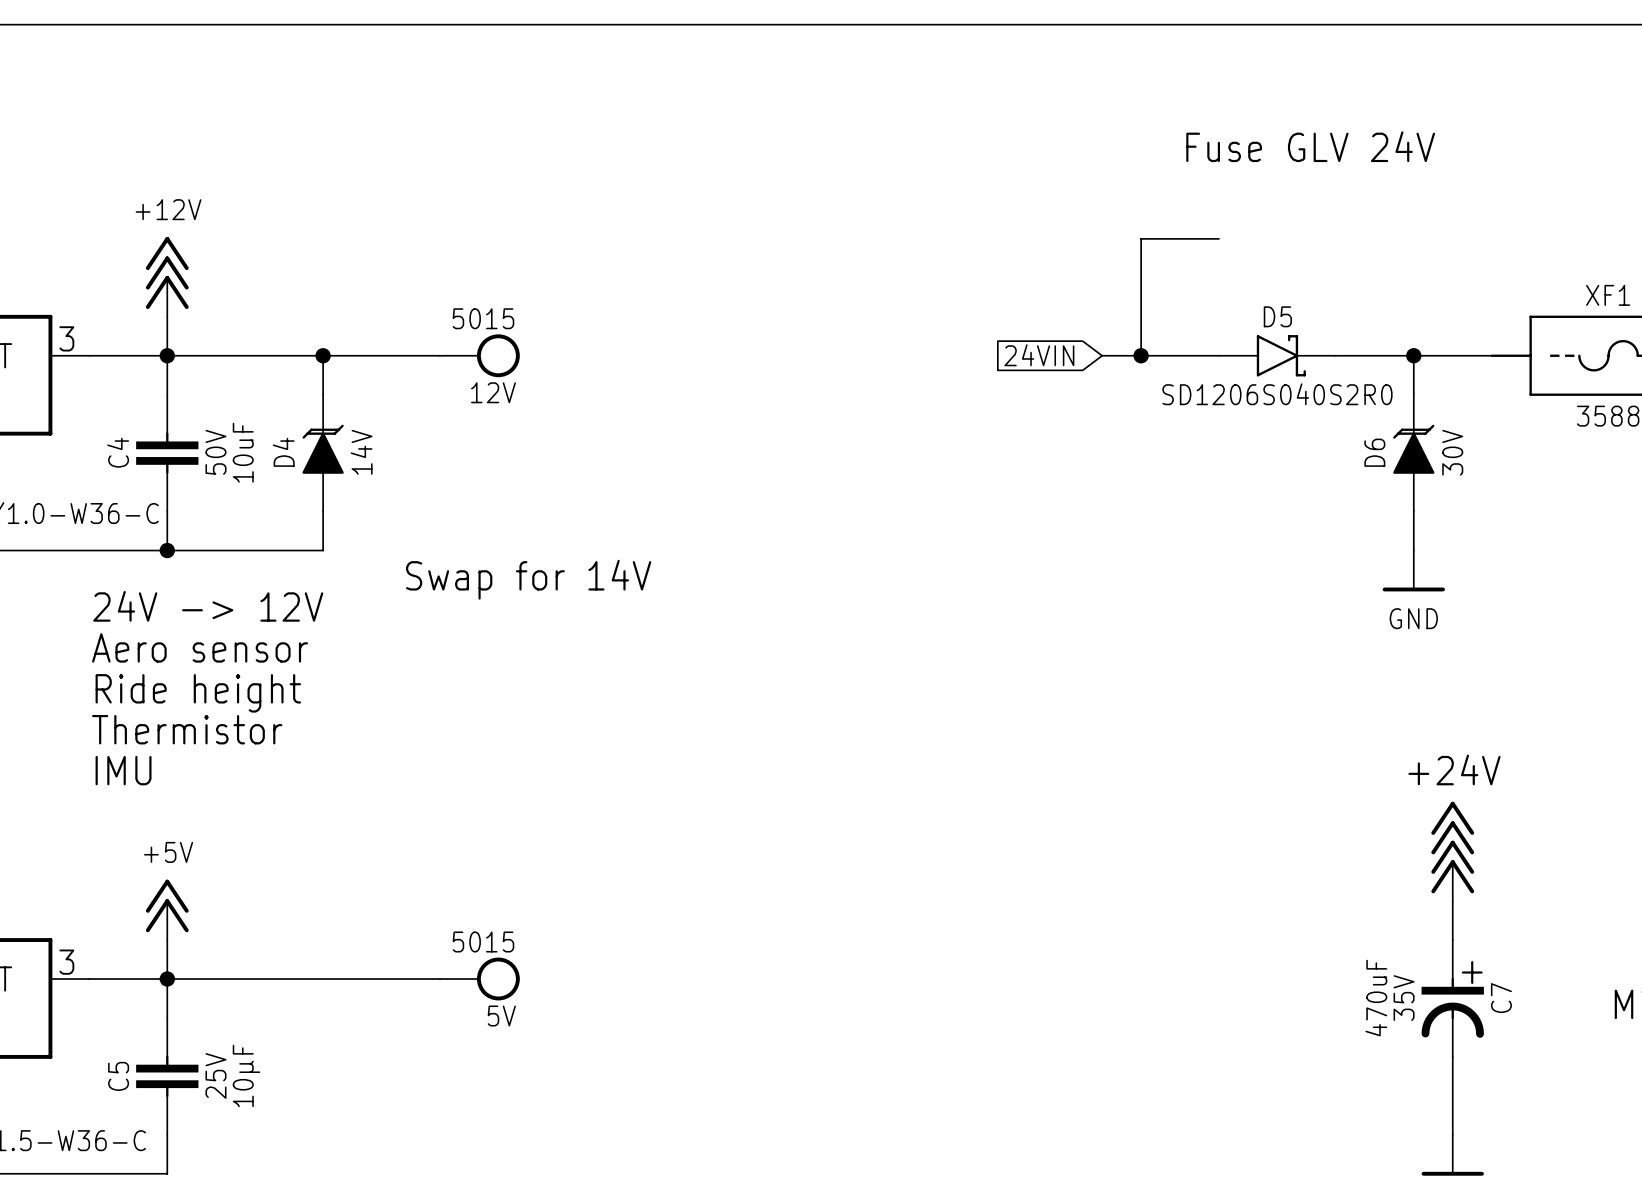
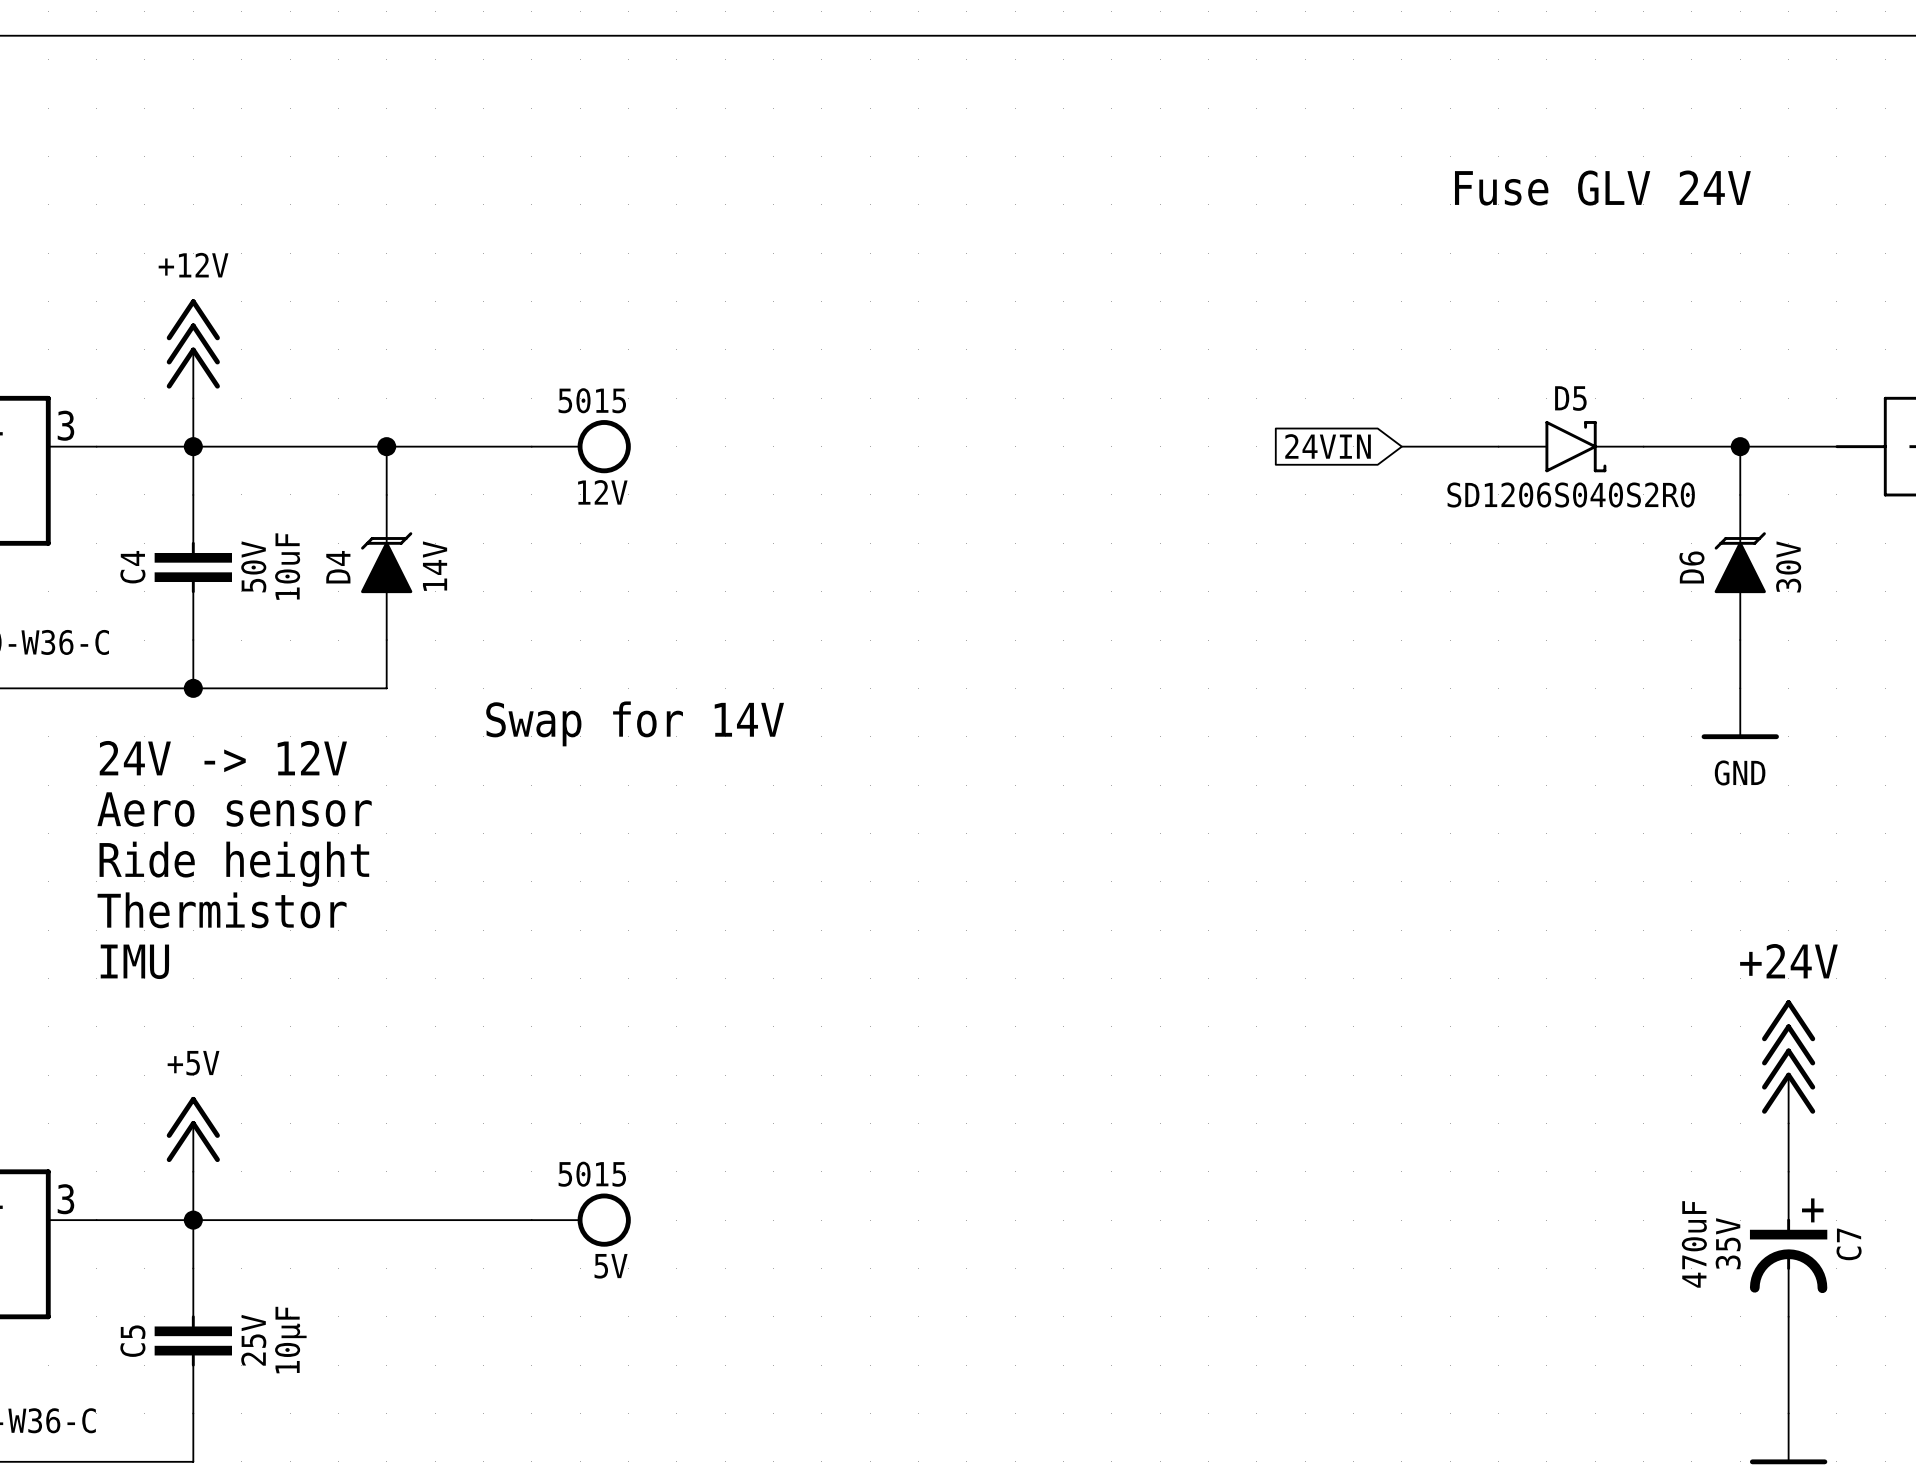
wire: (1219, 238) (1141, 238) (1141, 355) (1102, 355) -> none
global label position: 24VIN (1039, 355) -> 24VIN (1328, 446)
junction: (1141, 355) -> none

